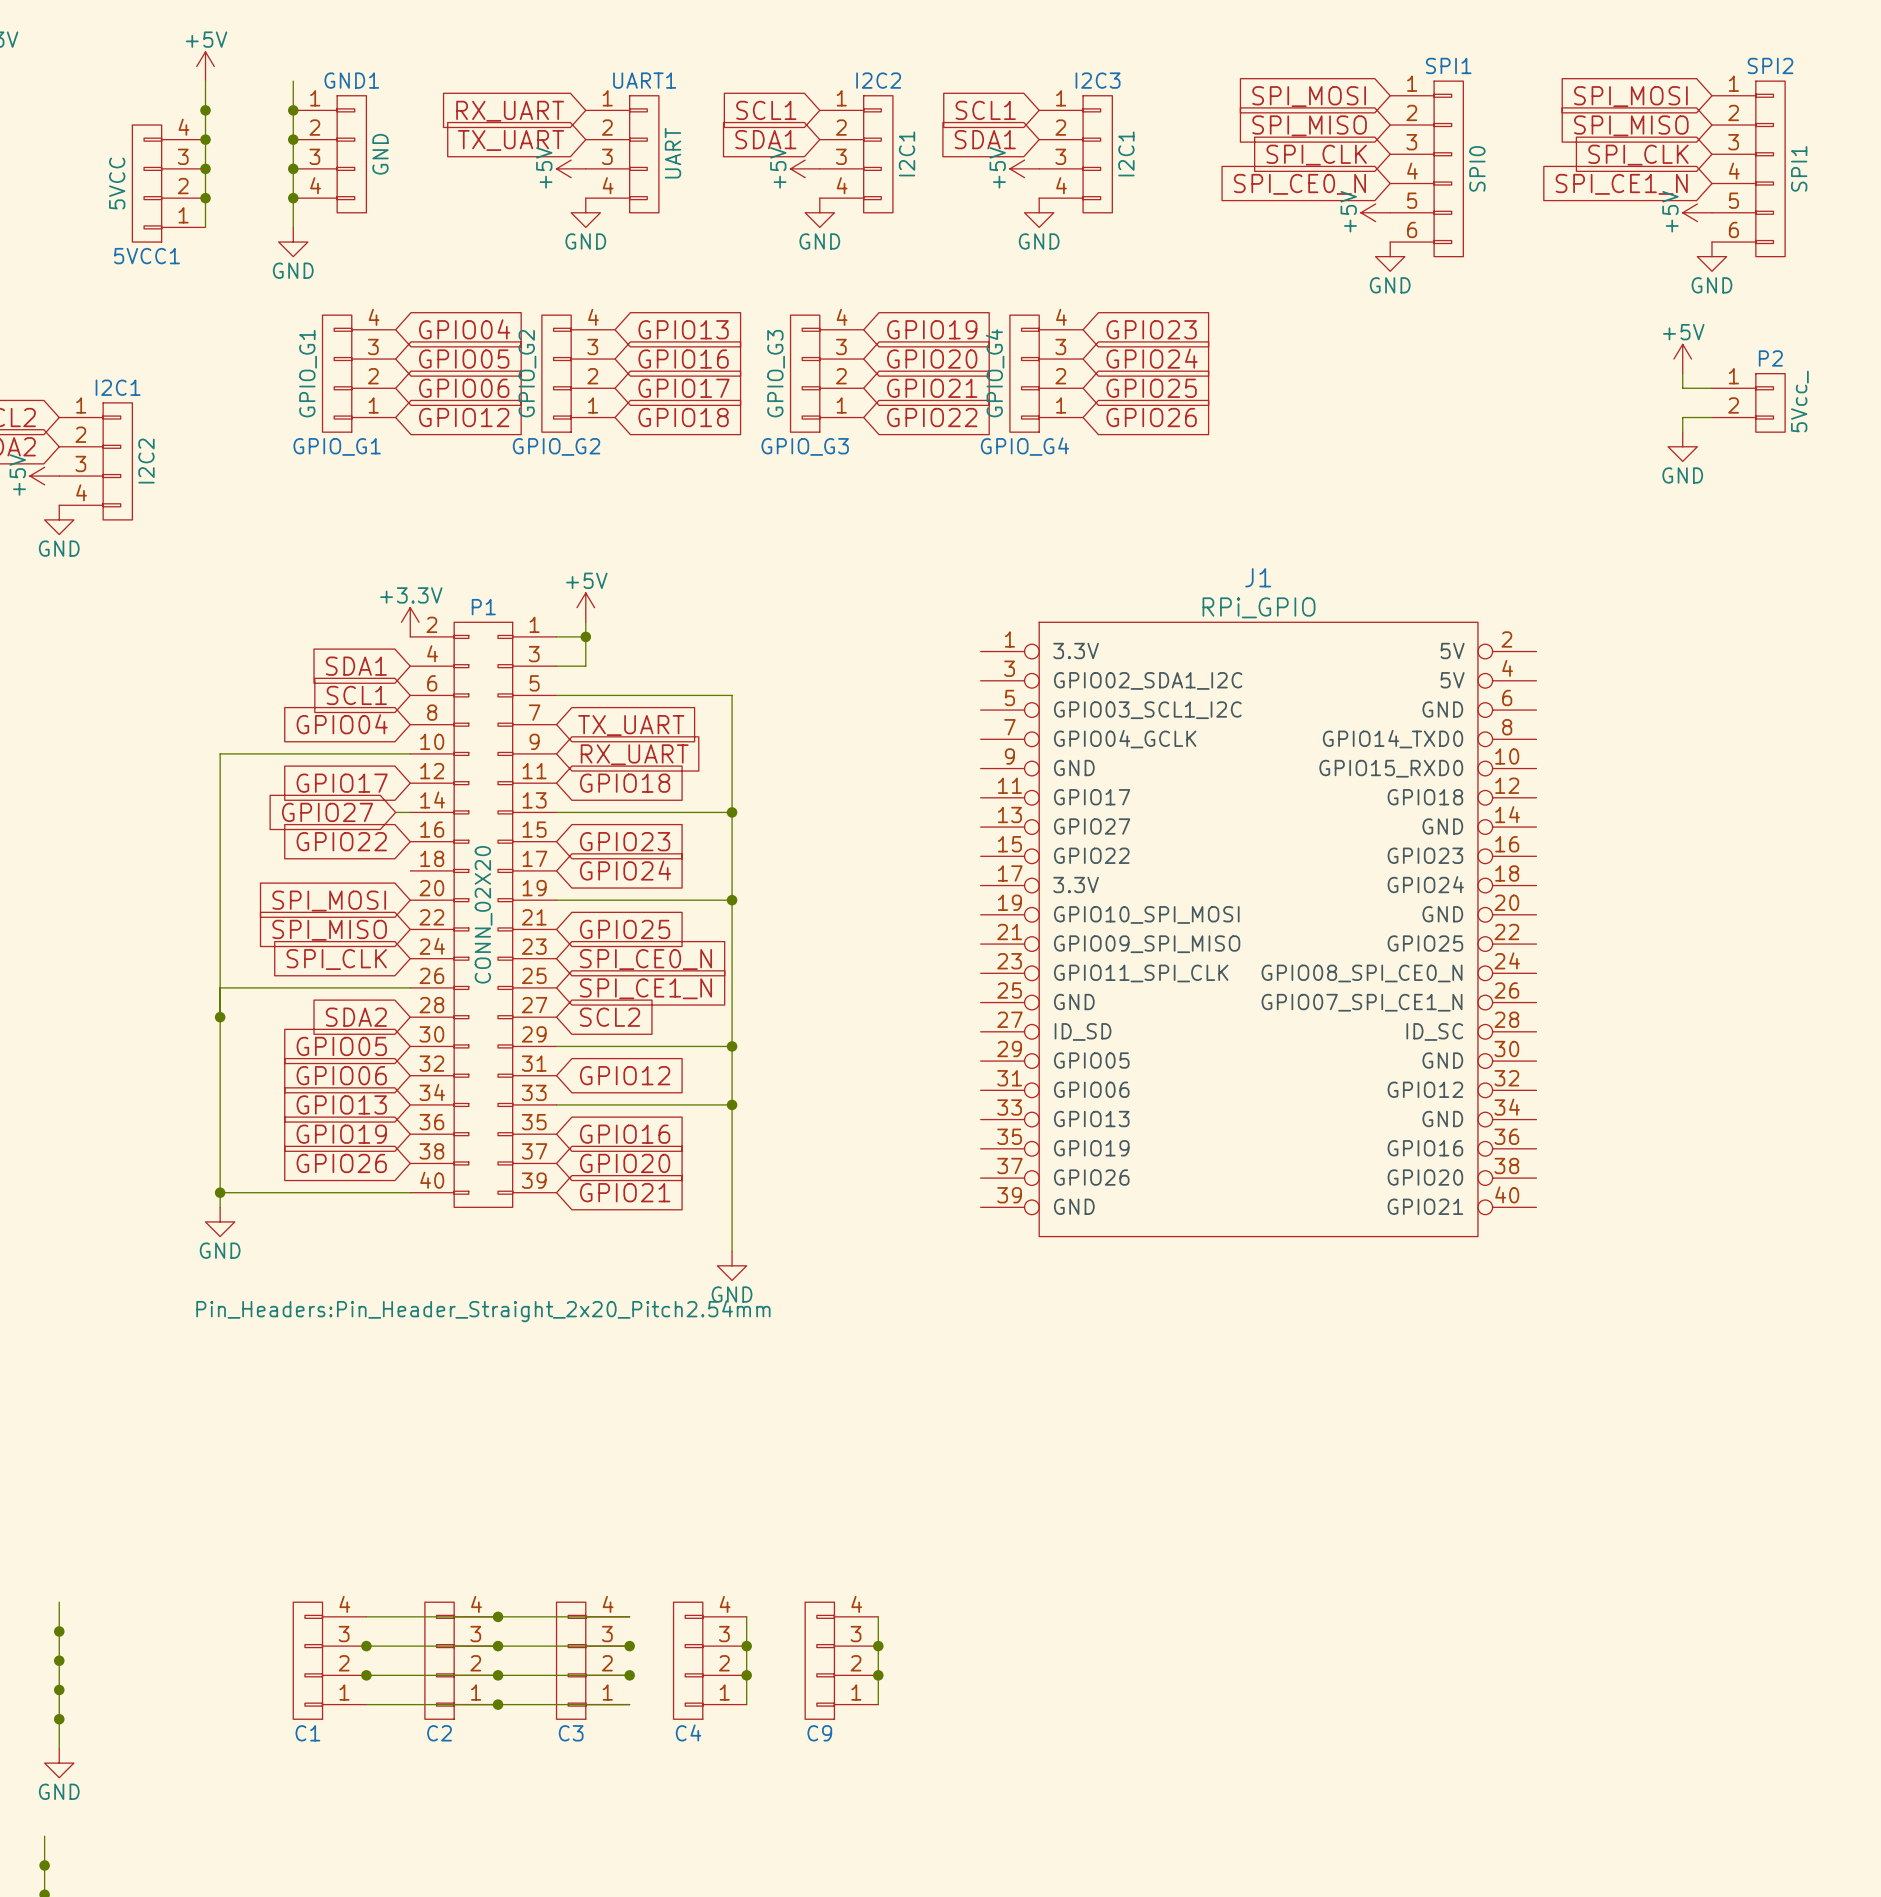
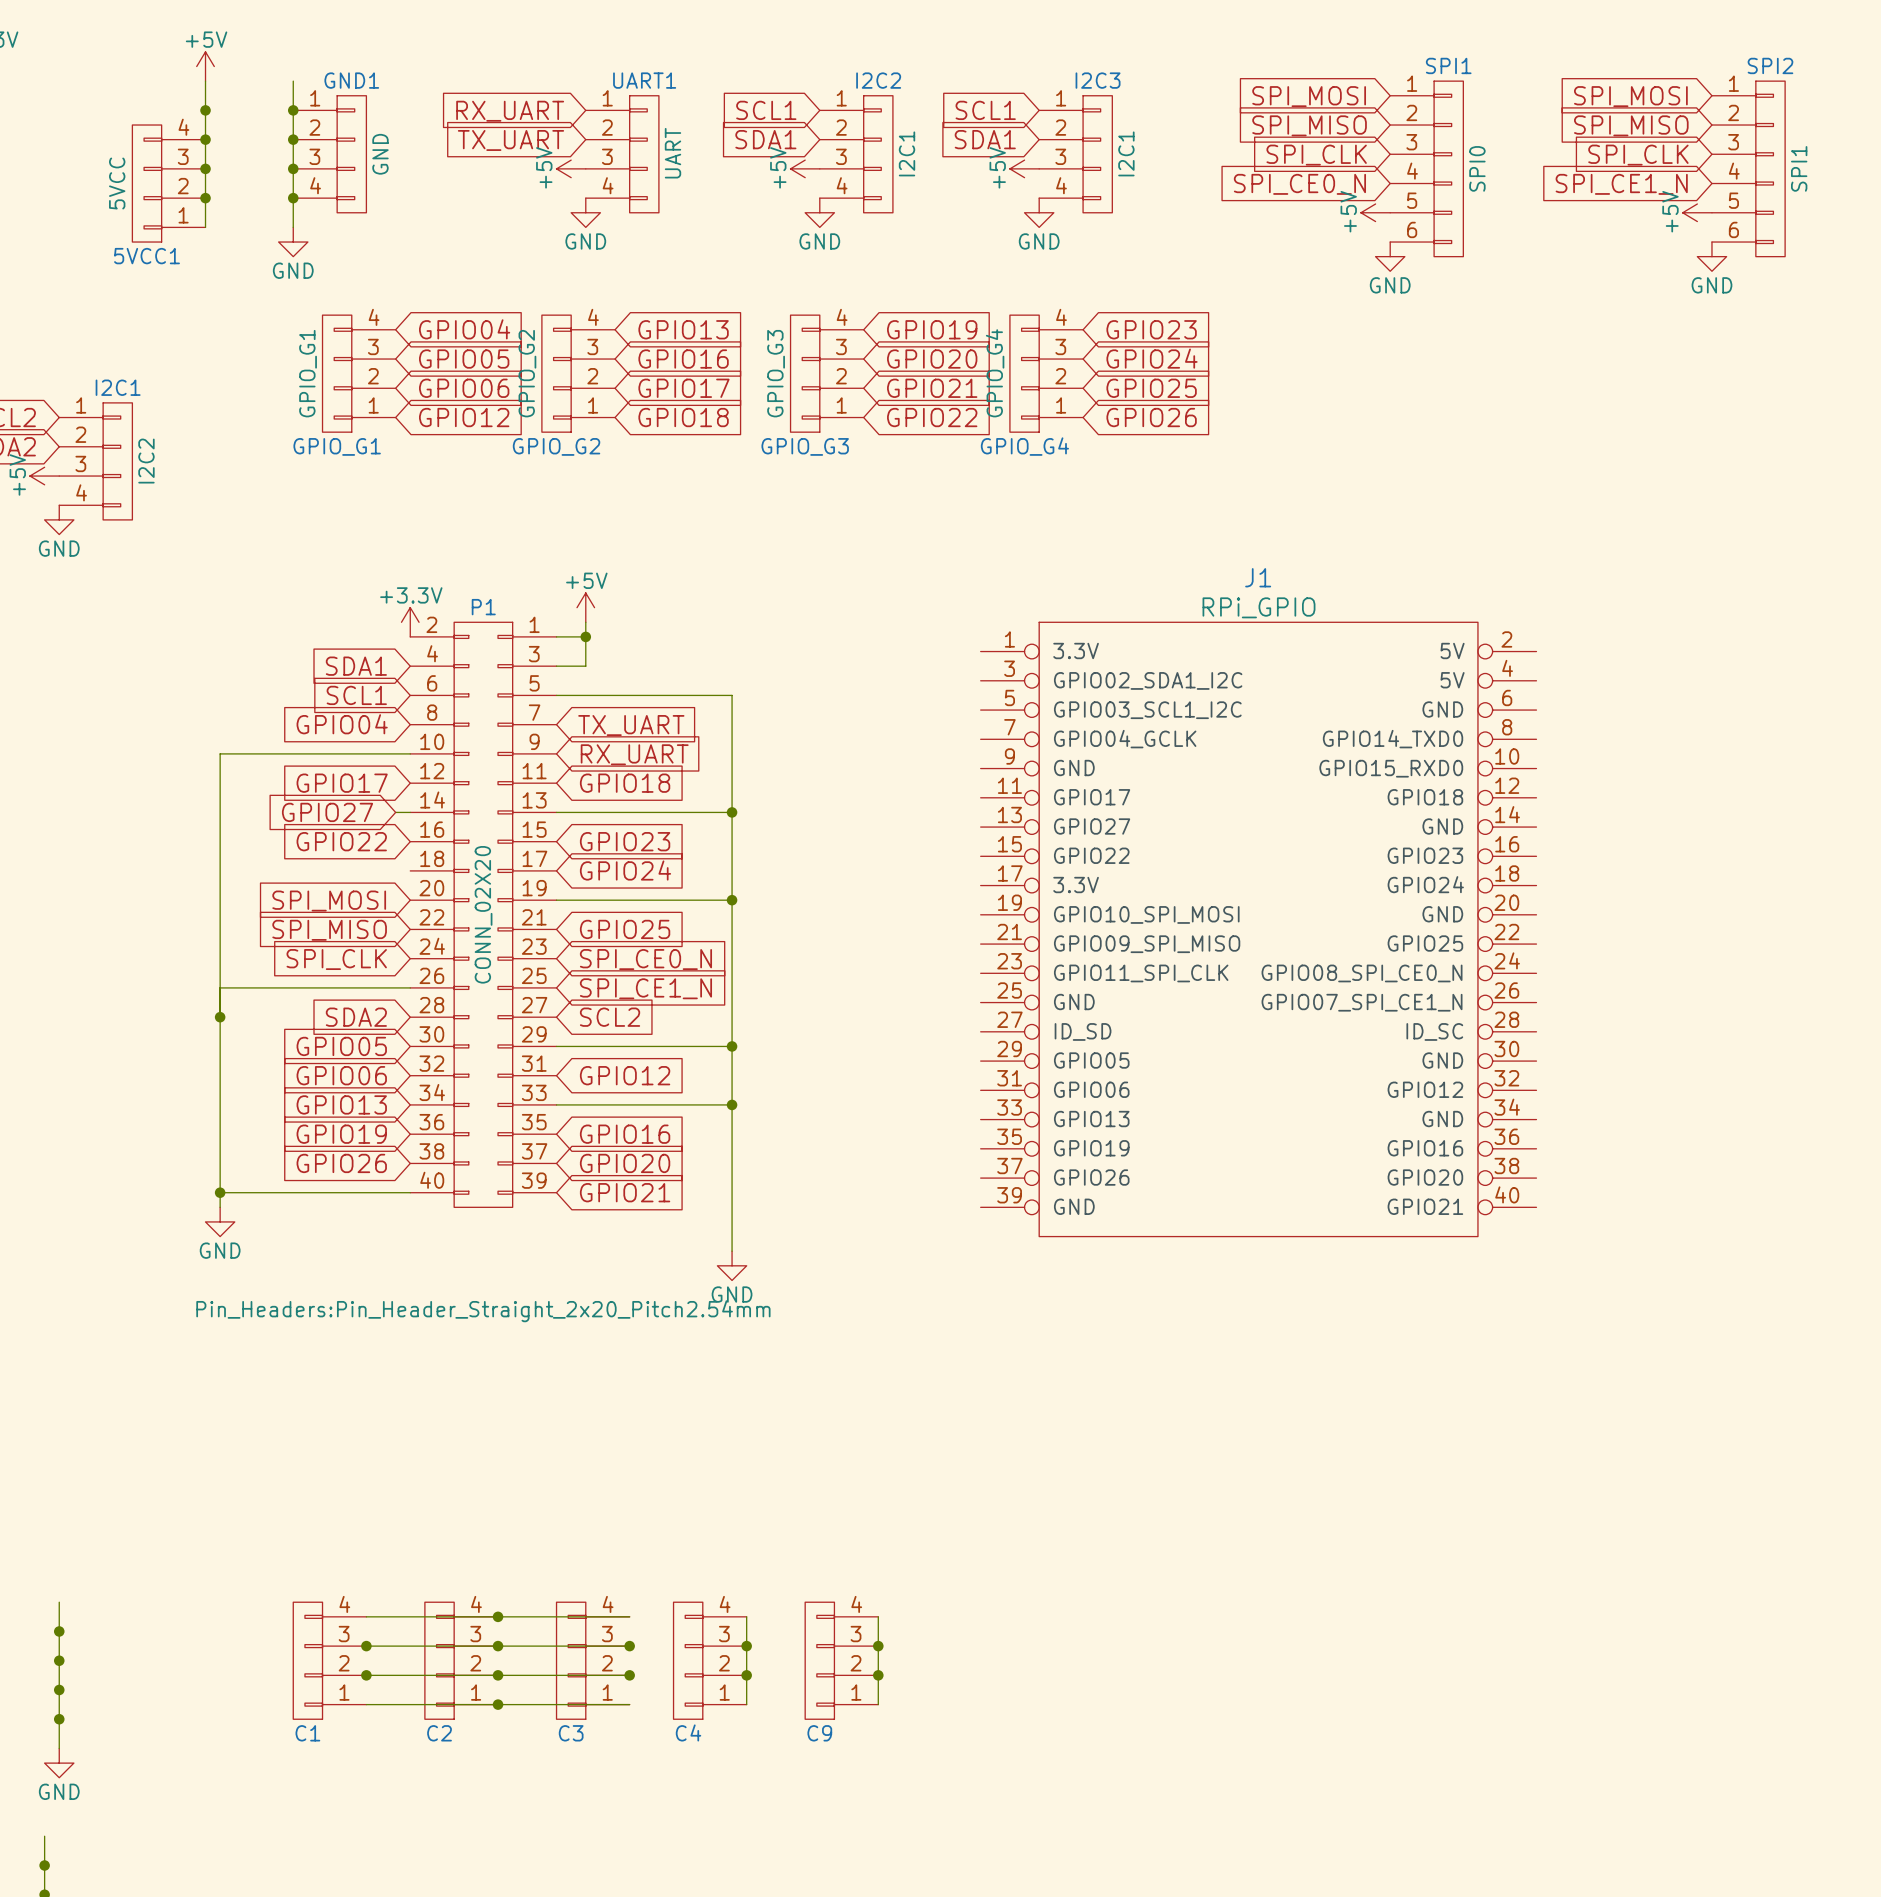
power symbol: +5V (1682, 359) -> none
wire: (1682, 373) (1682, 388) (1711, 388) -> none
P2: 5Vcc_ (1748, 402) -> none
wire: (1711, 417) (1682, 417) (1682, 432) -> none
power symbol: GND (1682, 446) -> none

